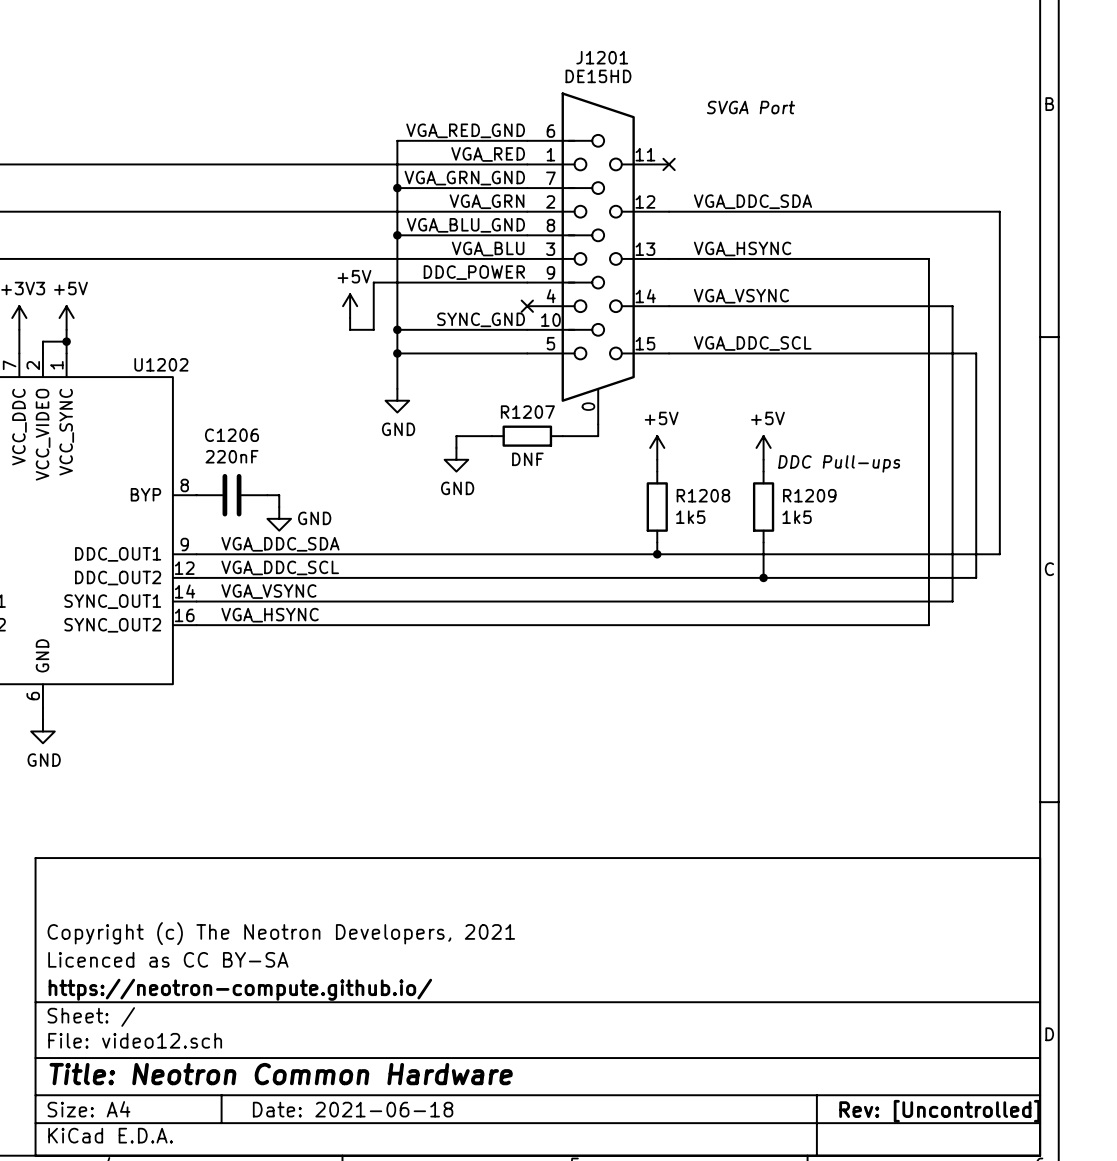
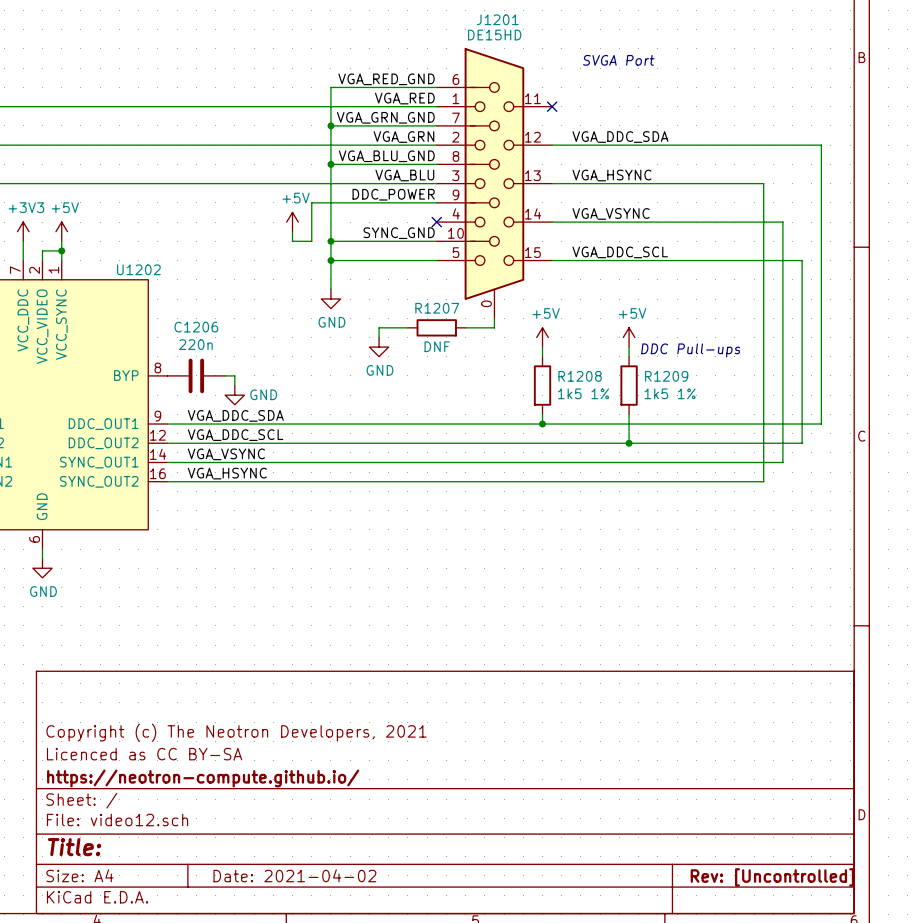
C1206 value: 220nF (231, 456) -> 220n (195, 344)
R1208 value: 1k5 (690, 517) -> 1k5 1% (583, 393)
R1209 value: 1k5 (797, 517) -> 1k5 1% (670, 393)
title block: Title: Neotron Common Hardware (281, 1074) -> Title: (74, 847)
title block: Date: 2021-06-18 (353, 1109) -> Date: 2021-04-02 (294, 875)

